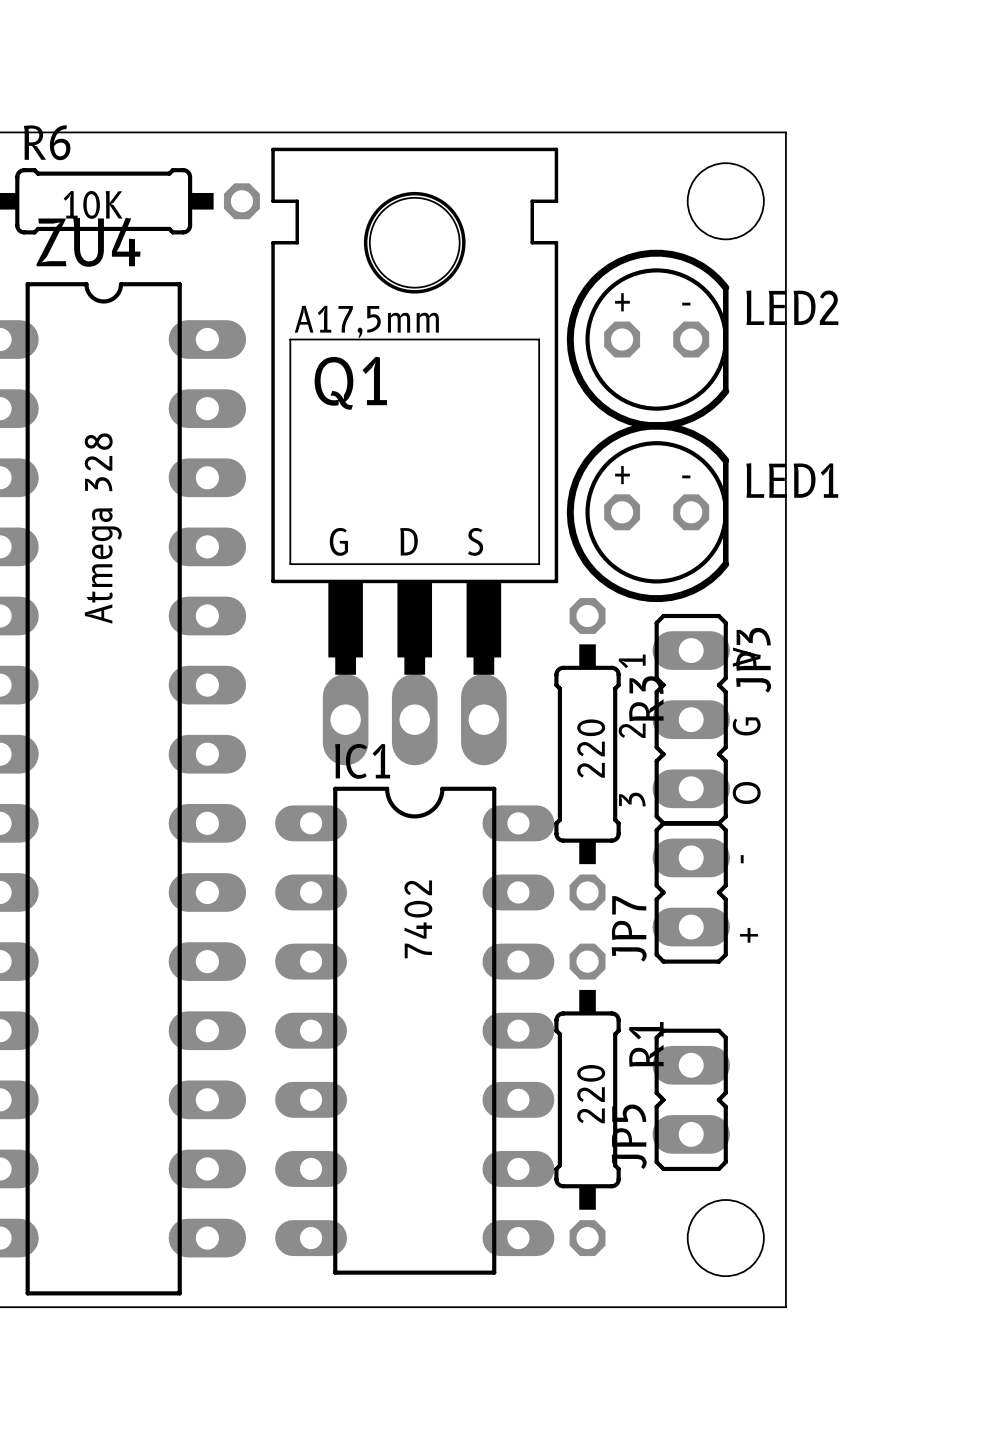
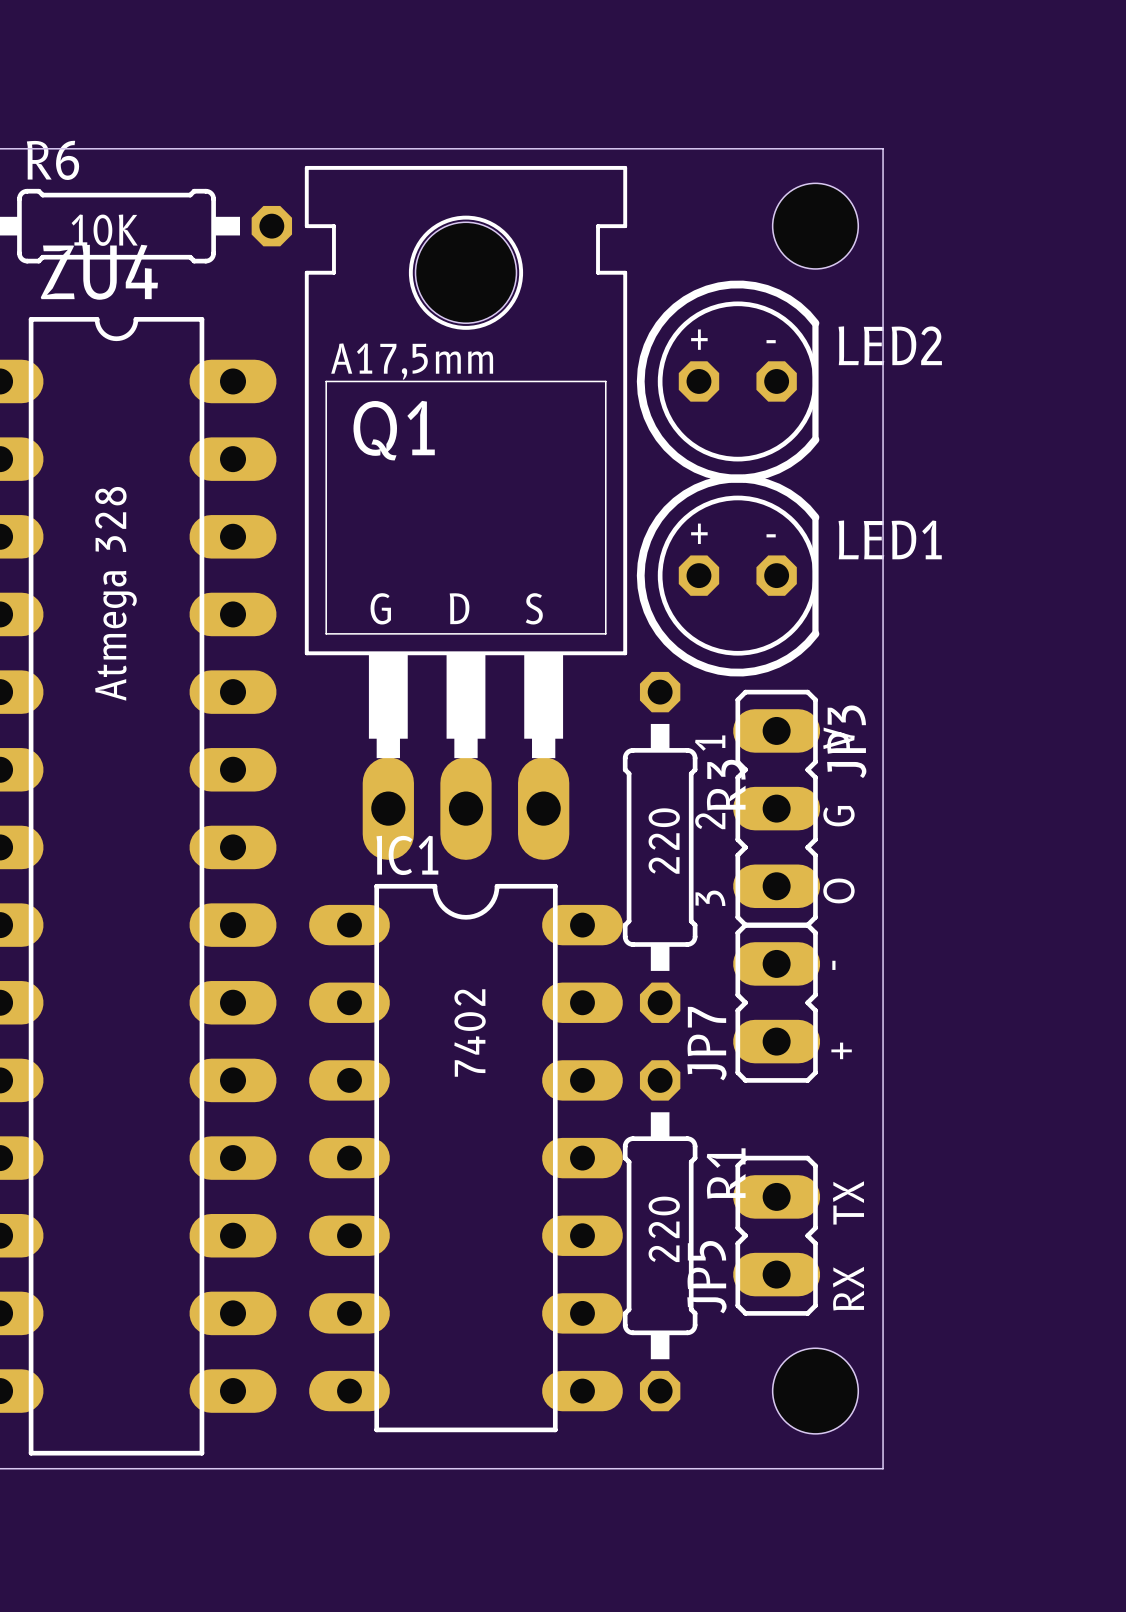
text: none -> TX (848, 1202)
text: none -> RX (848, 1288)

